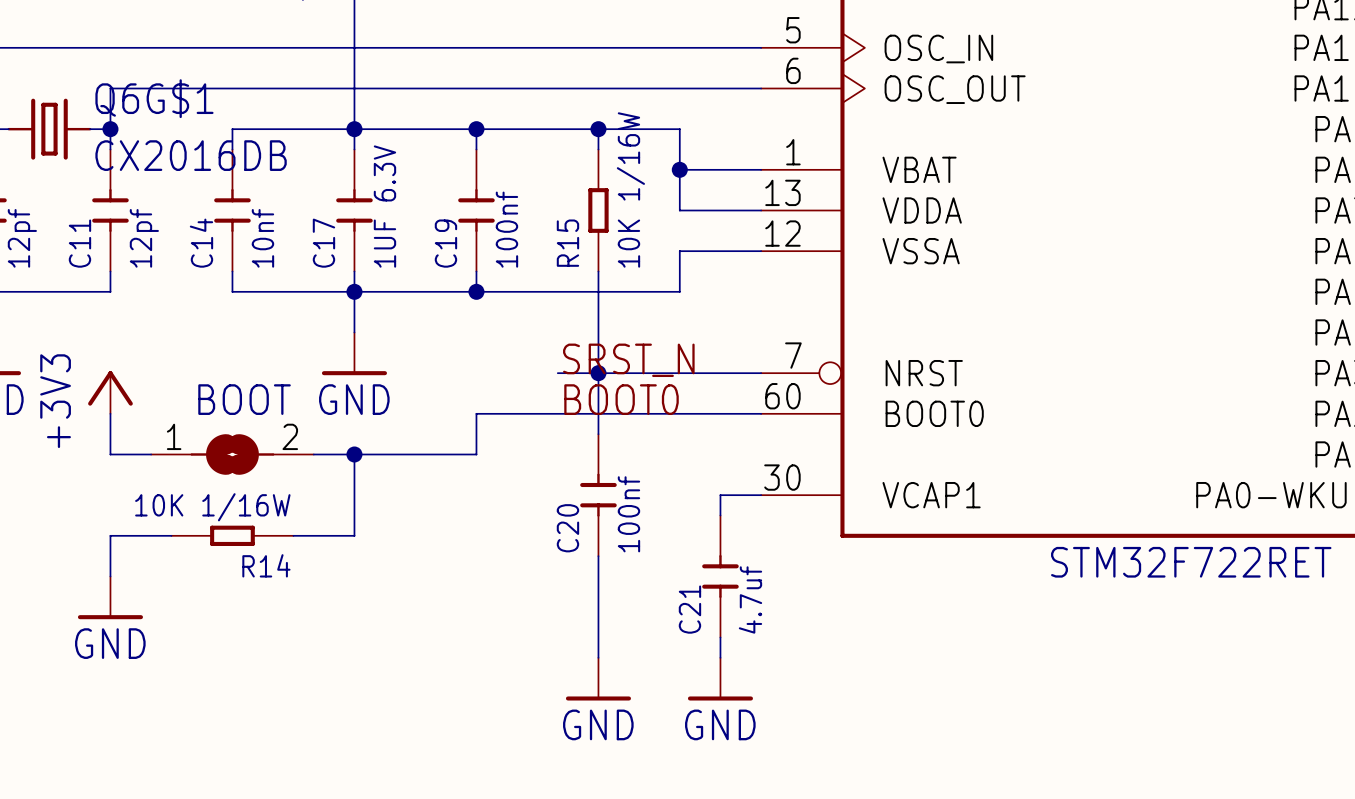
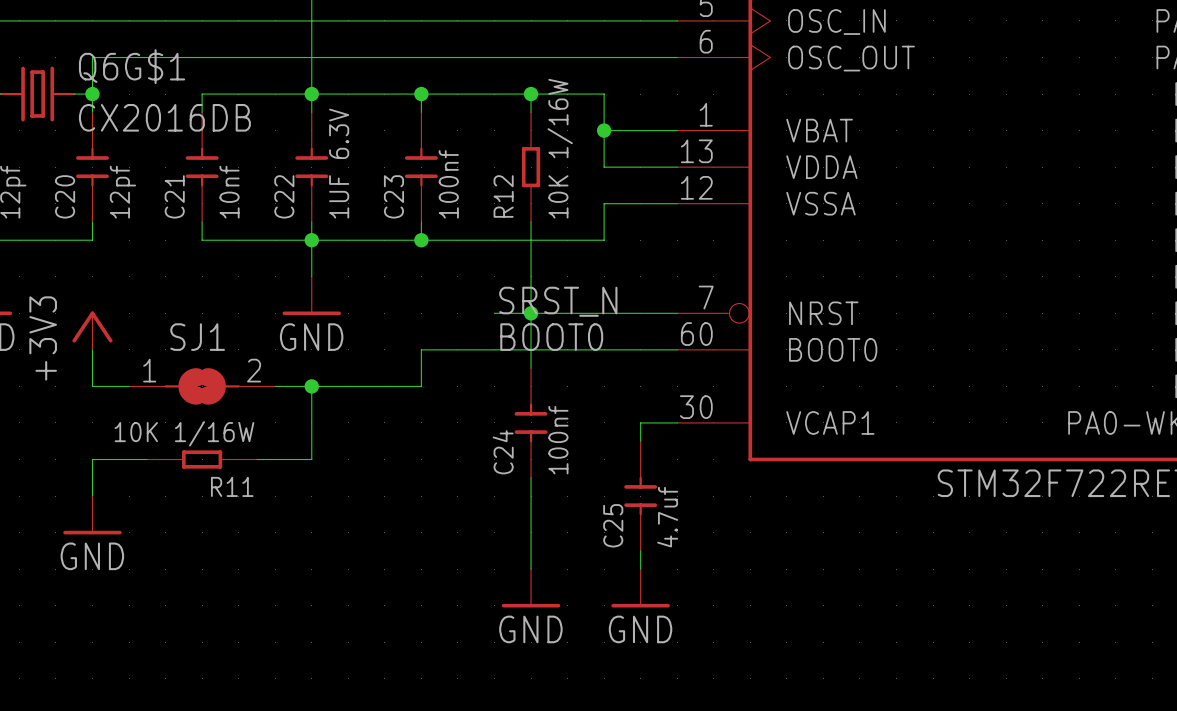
C11 name: C11 (79, 243) -> C20 (65, 196)
C14 name: C14 (201, 243) -> C21 (174, 196)
C17 name: C17 (323, 243) -> C22 (284, 196)
C19 name: C19 (445, 243) -> C23 (393, 196)
R15 name: R15 (567, 243) -> R12 (503, 196)
BOOT name: BOOT (244, 399) -> SJ1 (197, 337)
C20 name: C20 (567, 528) -> C24 (503, 452)
R14 name: R14 (266, 565) -> R11 (232, 486)
C21 name: C21 (689, 609) -> C25 (613, 525)

